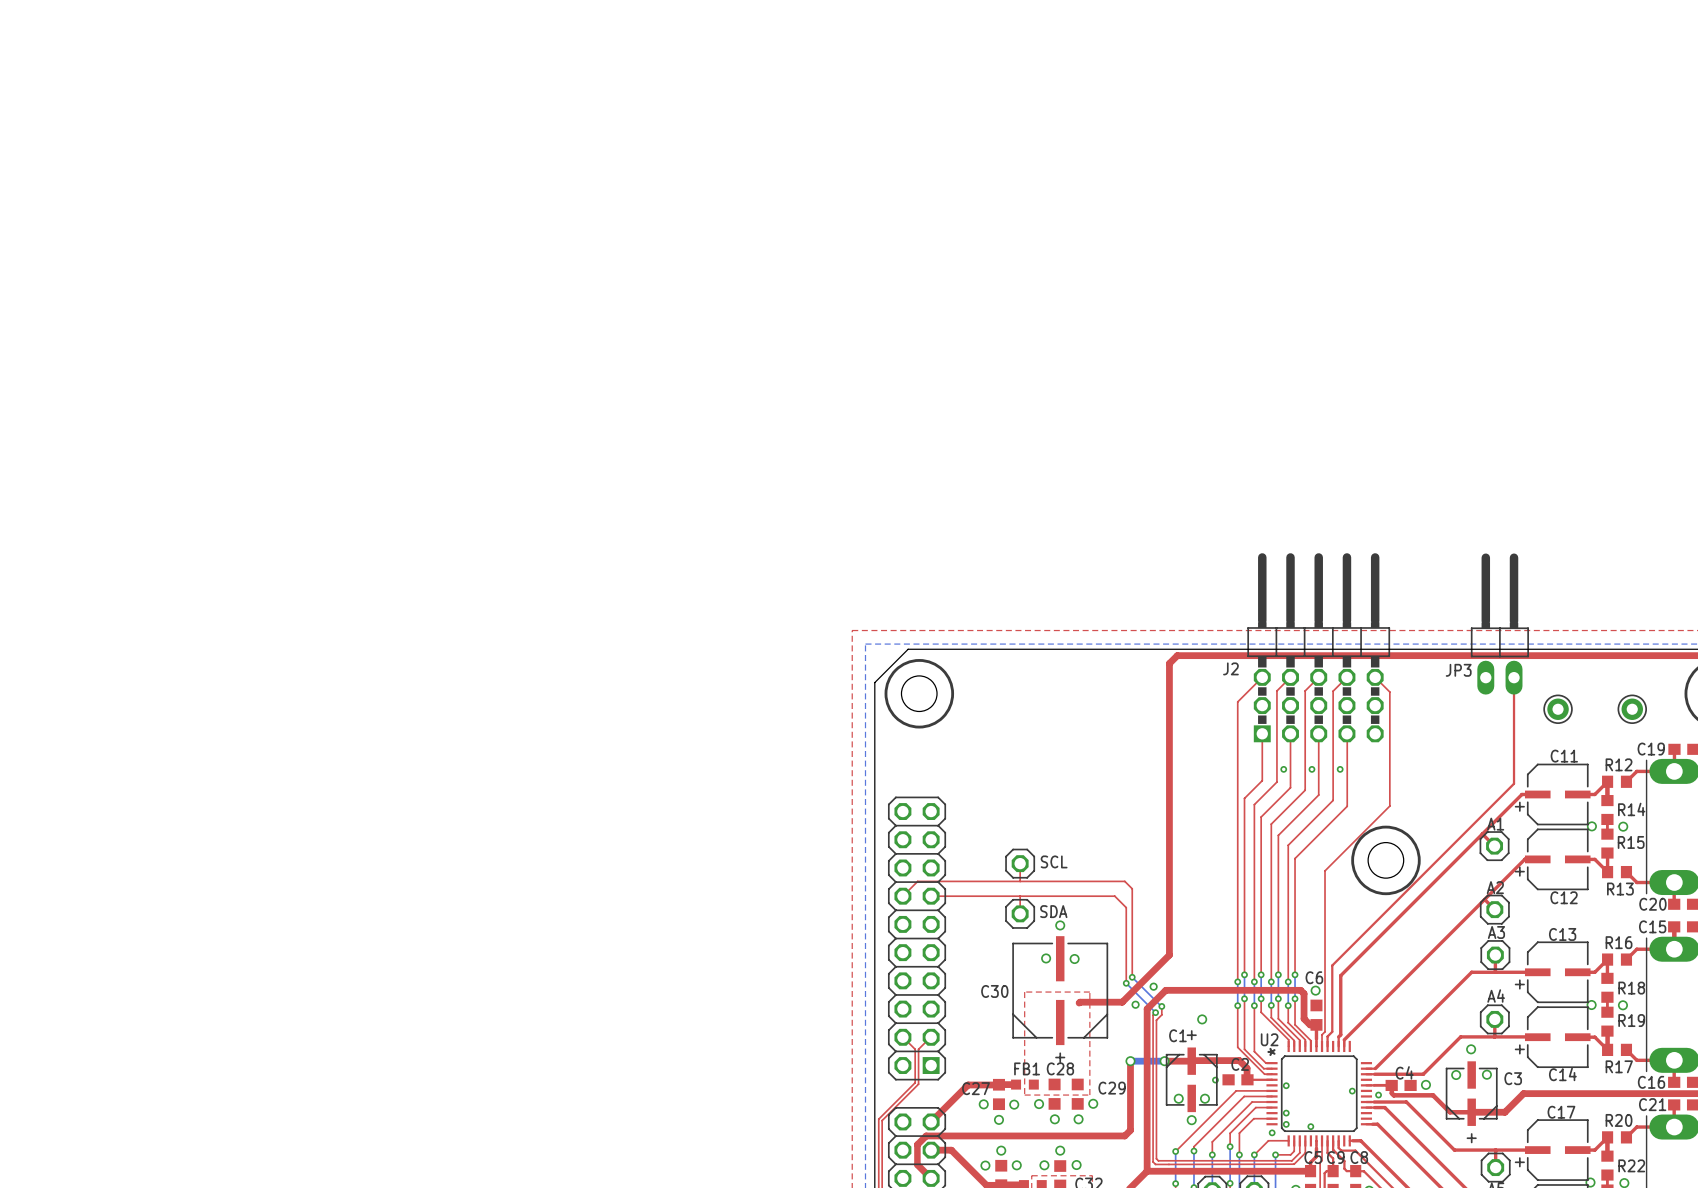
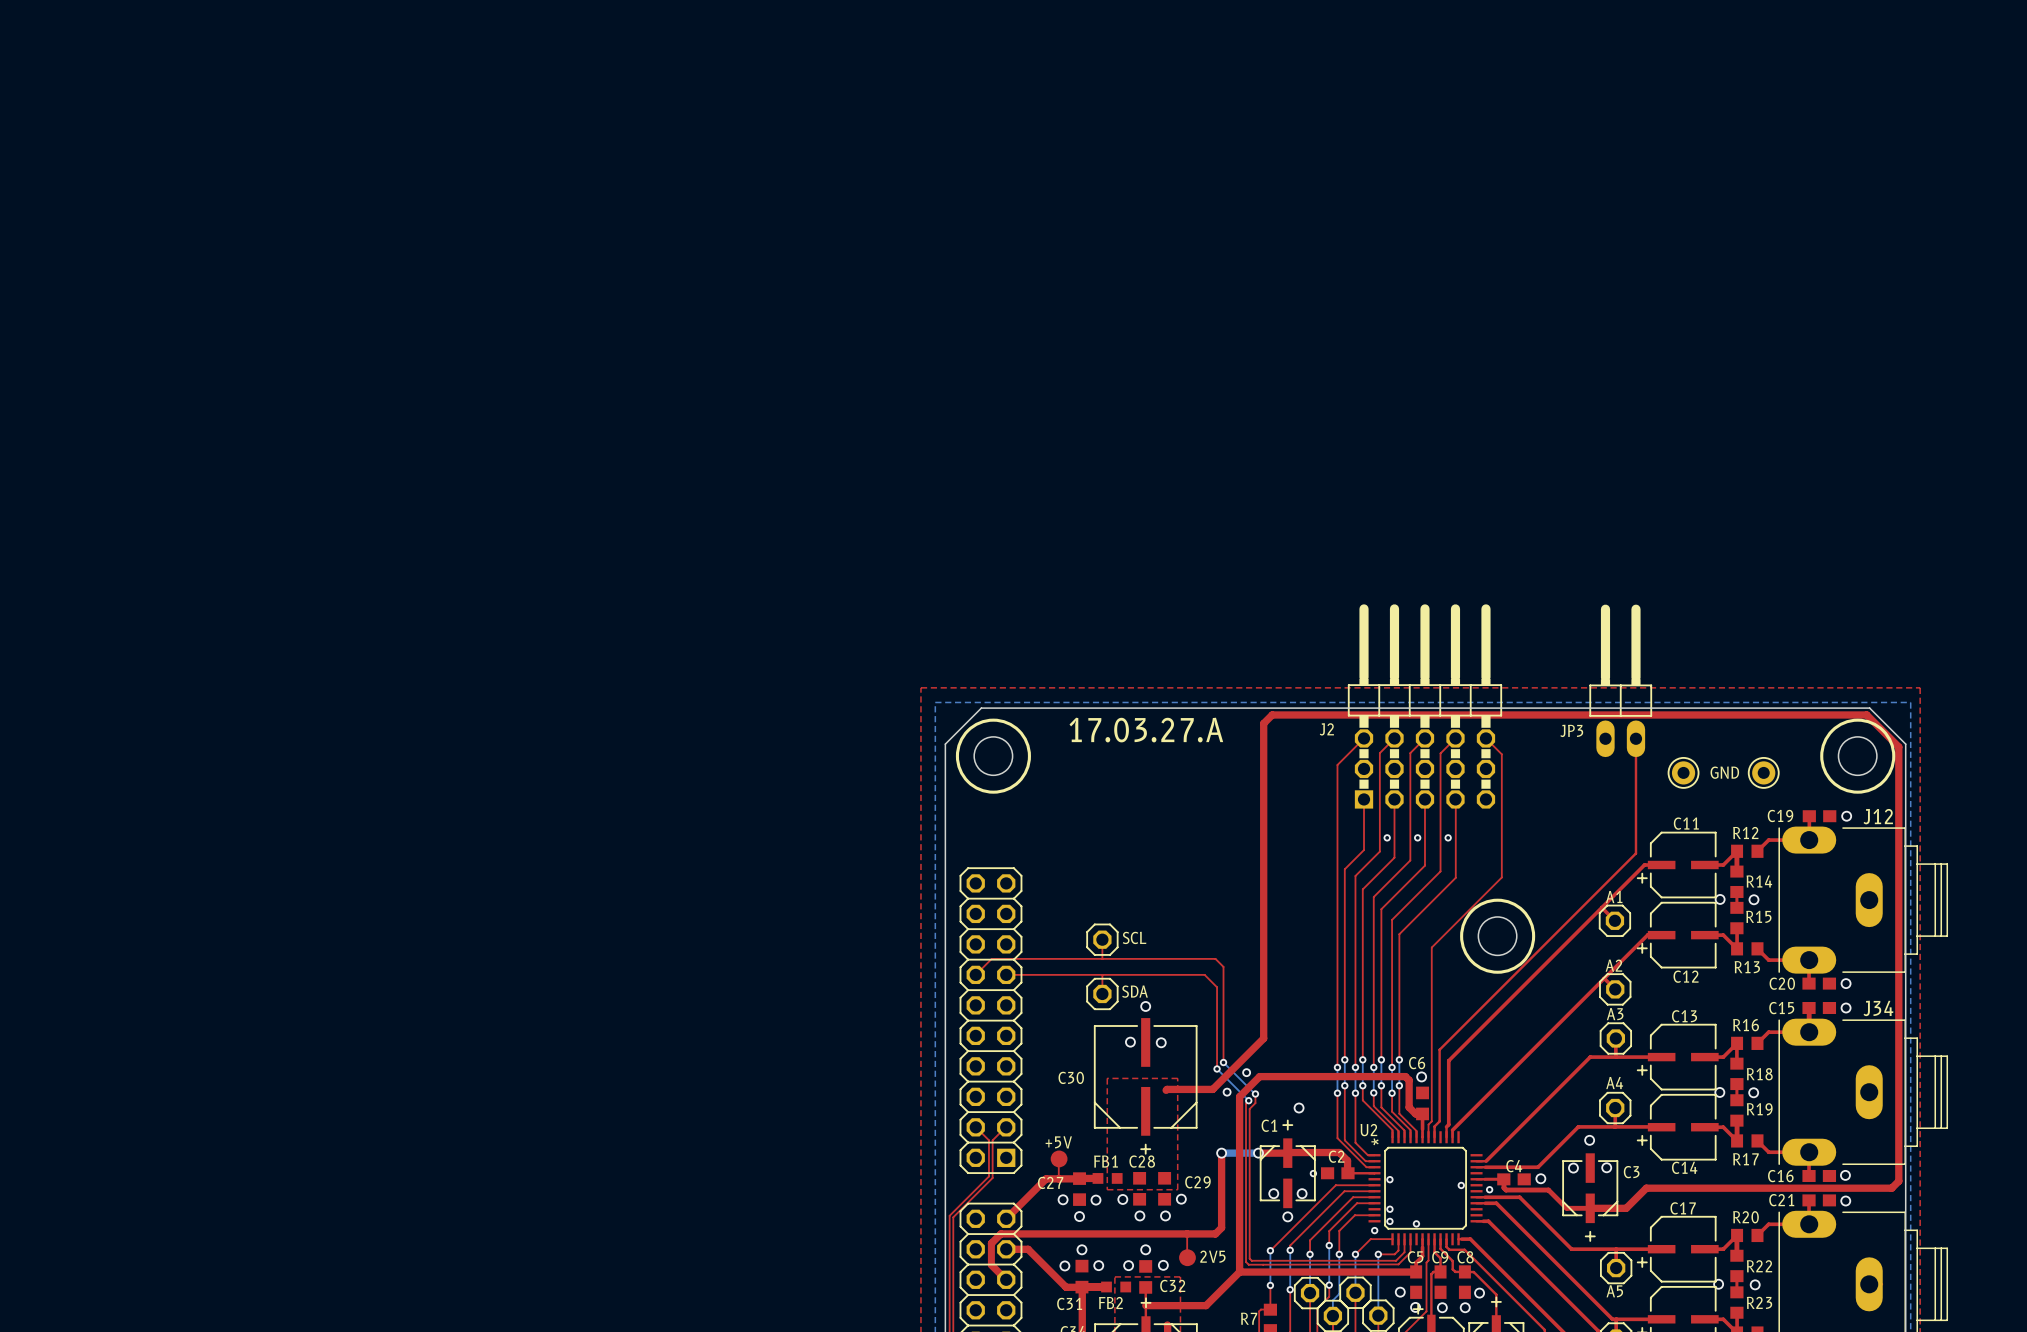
text: none -> 17.03.27.A (1146, 730)
text: none -> GND (1724, 772)
top track: none -> (1059, 1158) (1058, 1178)
+5V: none -> (1059, 1158)
top track: none -> (1187, 1233) (1187, 1257)
2V5: none -> (1187, 1257)

